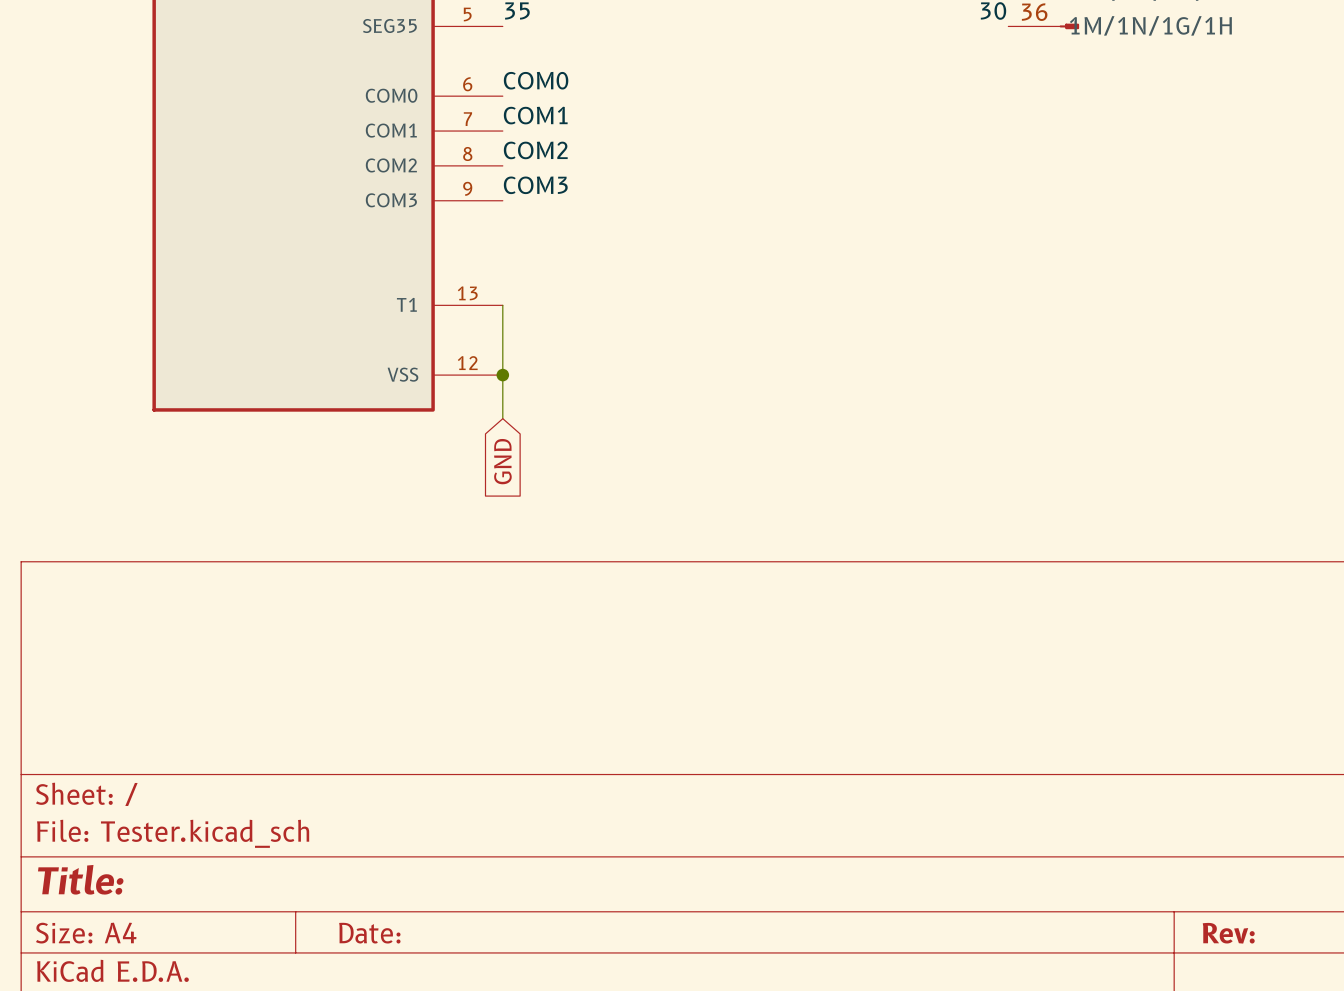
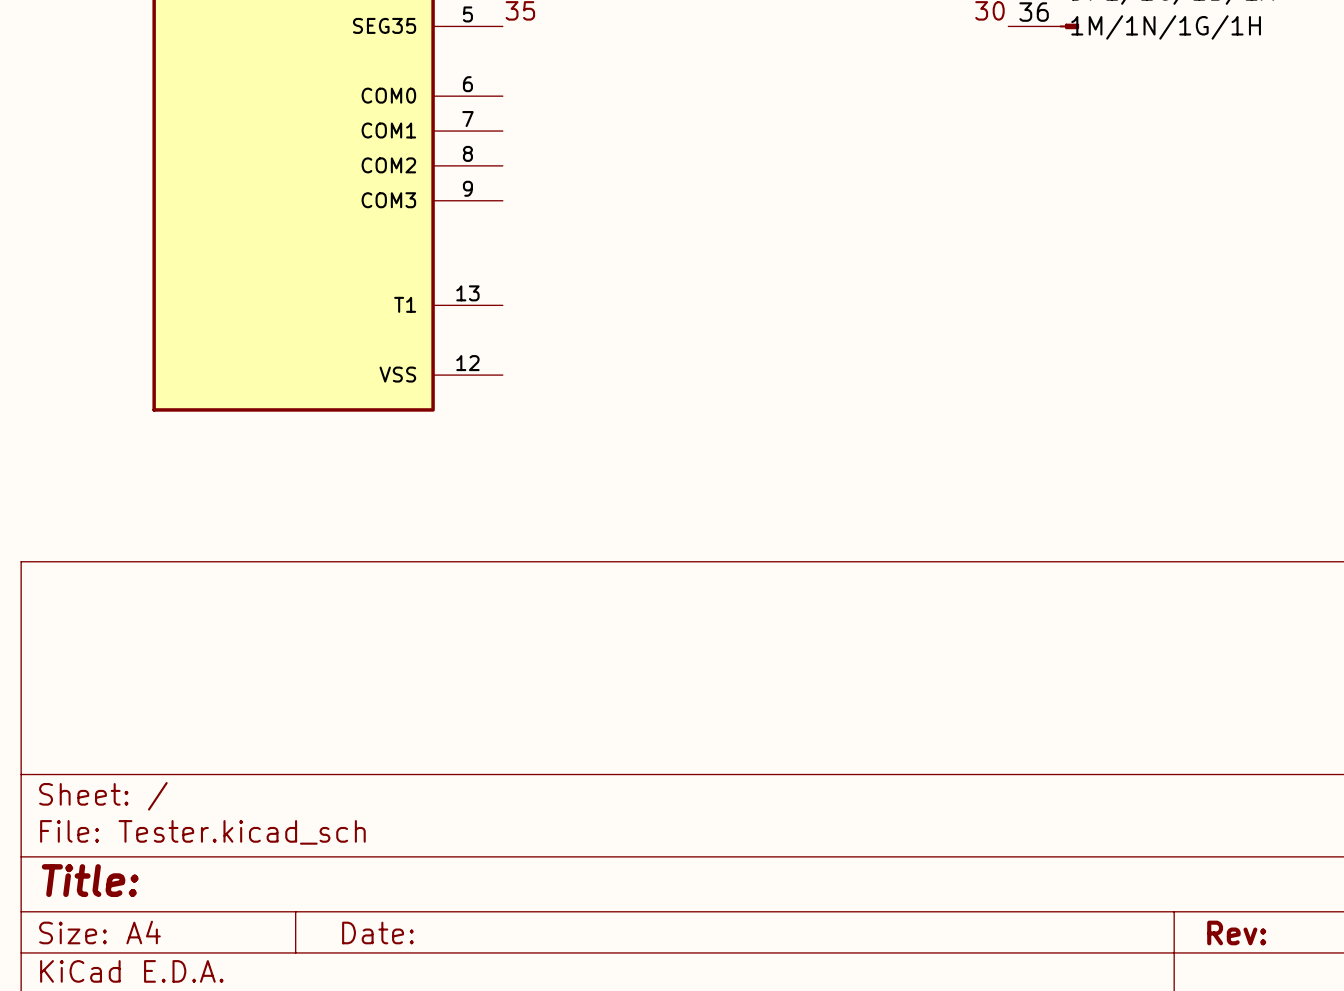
label: COM0 (536, 80) -> none
label: COM1 (535, 115) -> none
label: COM2 (535, 150) -> none
label: COM3 (535, 185) -> none
wire: (502, 305) (502, 418) -> none
junction: (502, 375) -> none
global label: GND (502, 461) -> none

